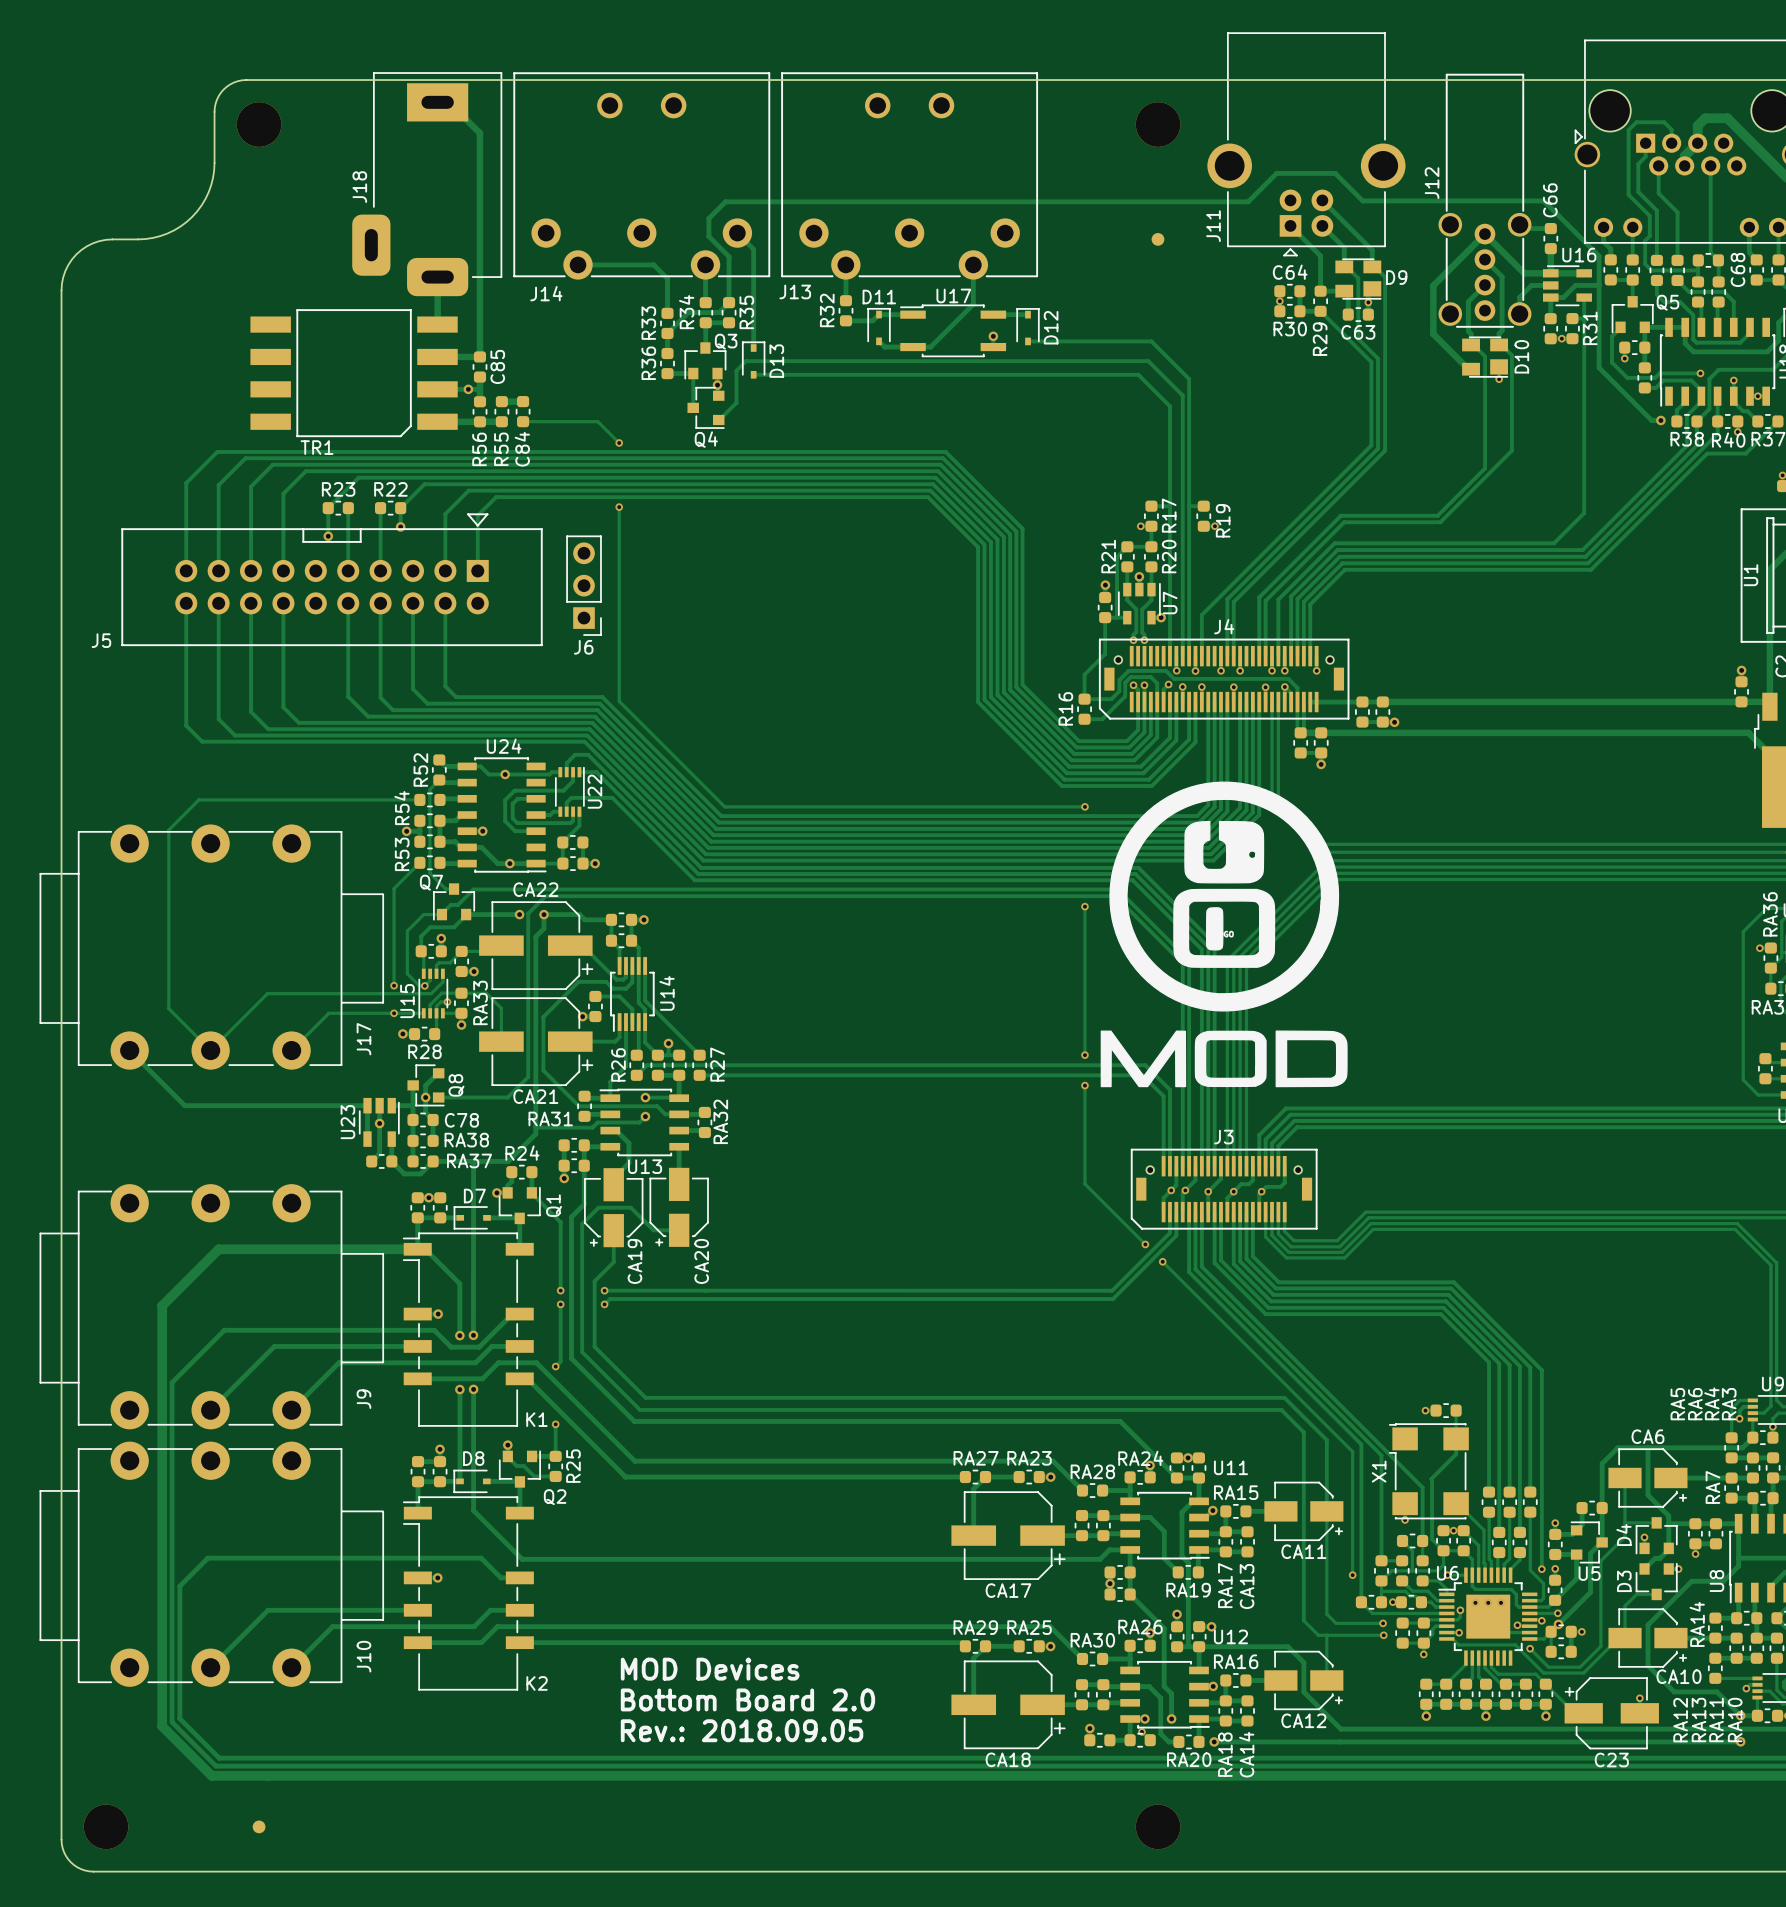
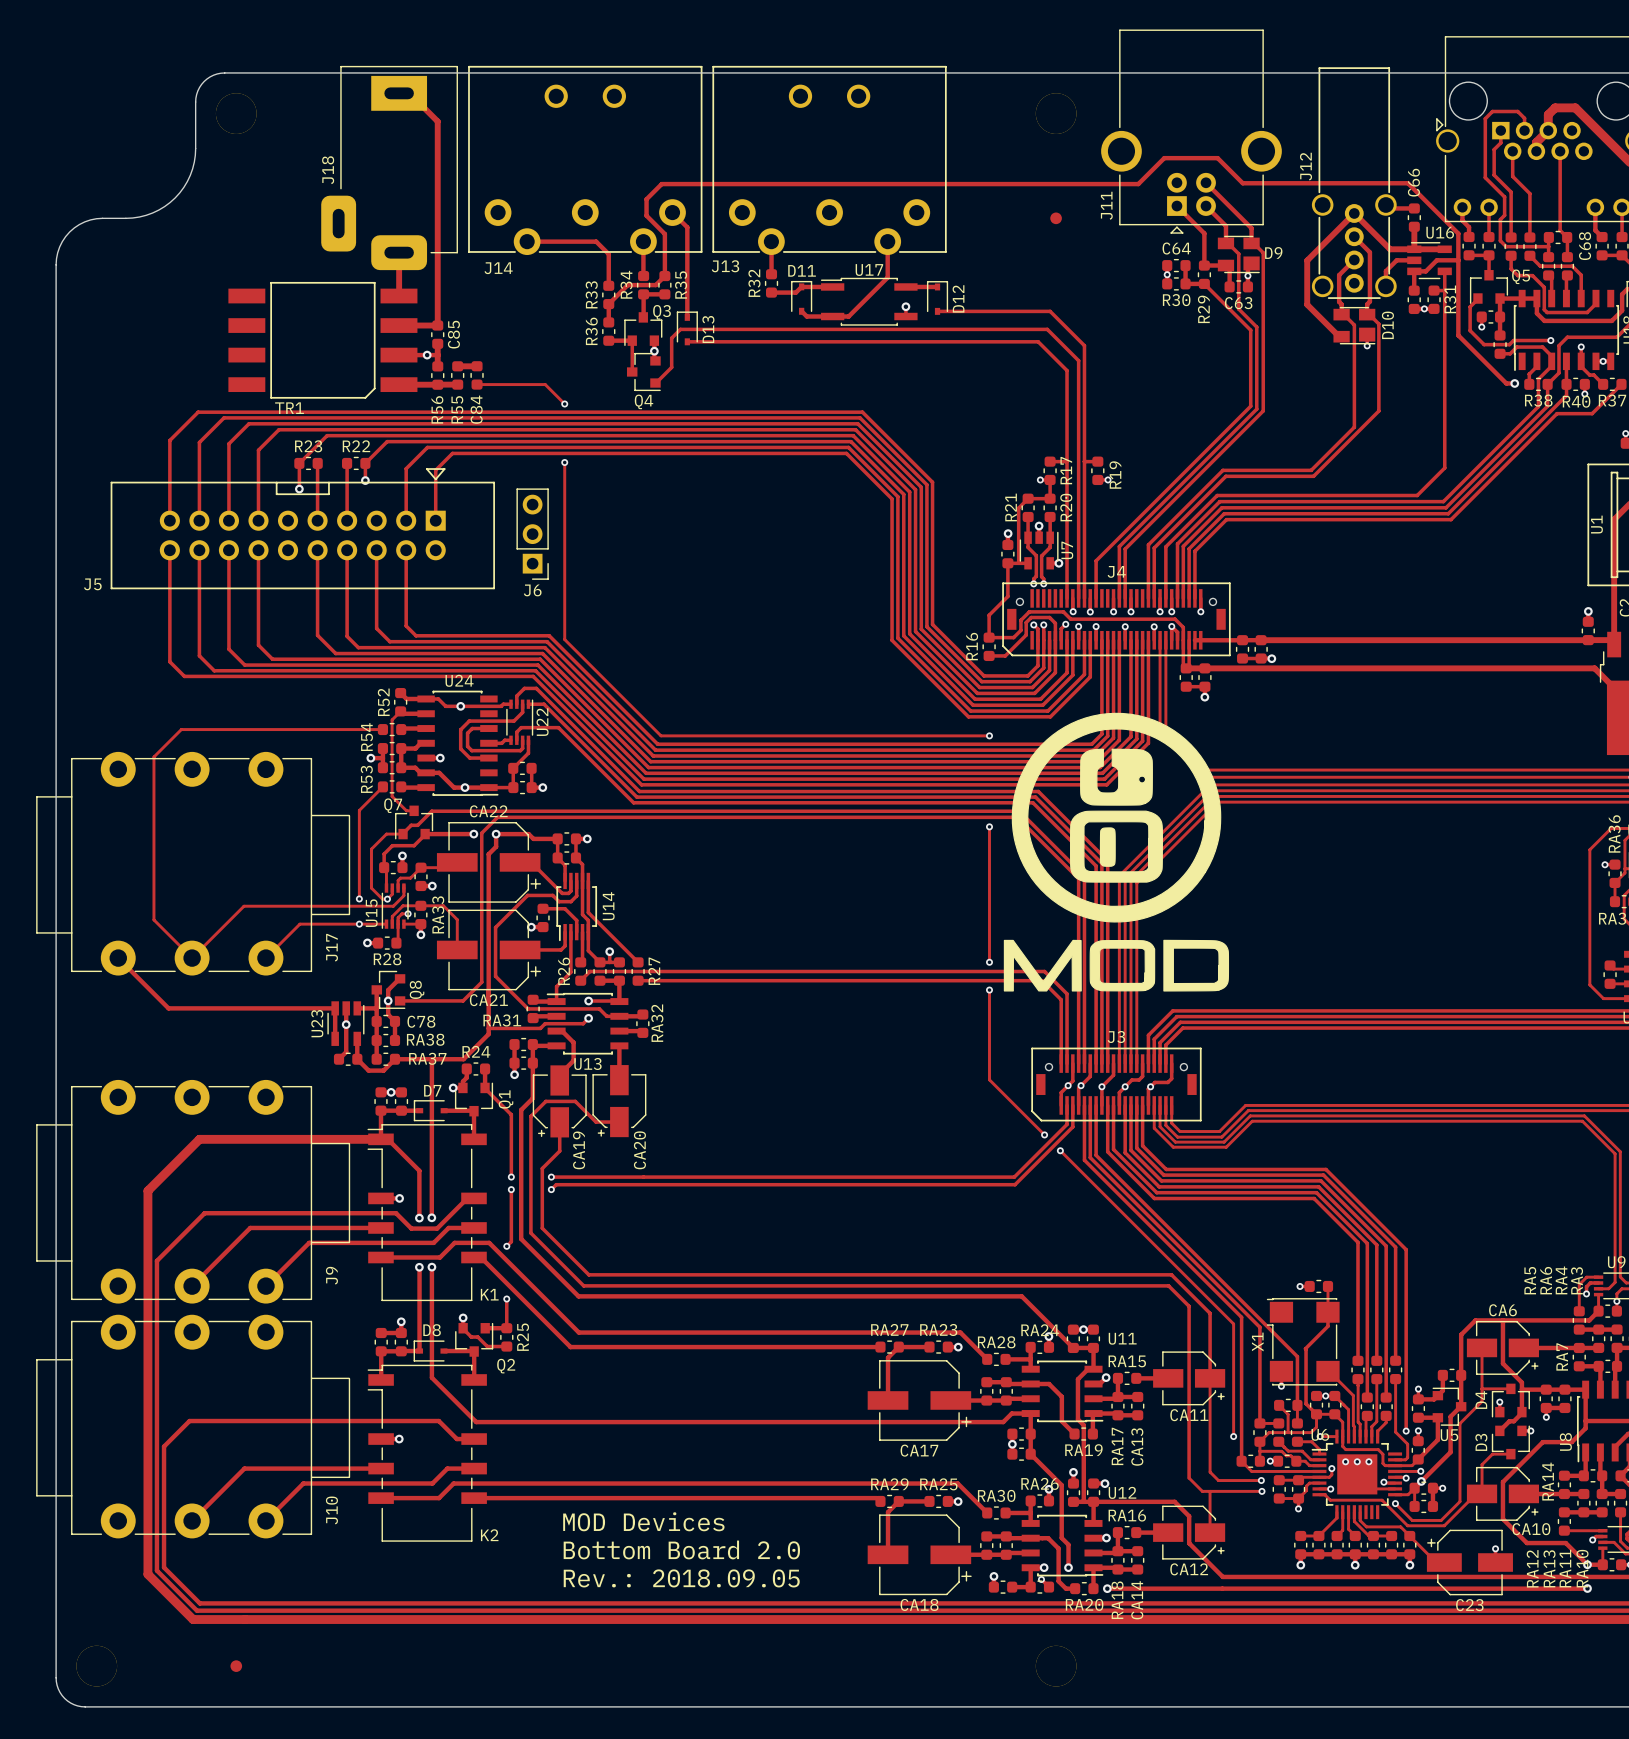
drawing shape: [1100, 781, 1348, 1088] -> [1003, 712, 1230, 992]

